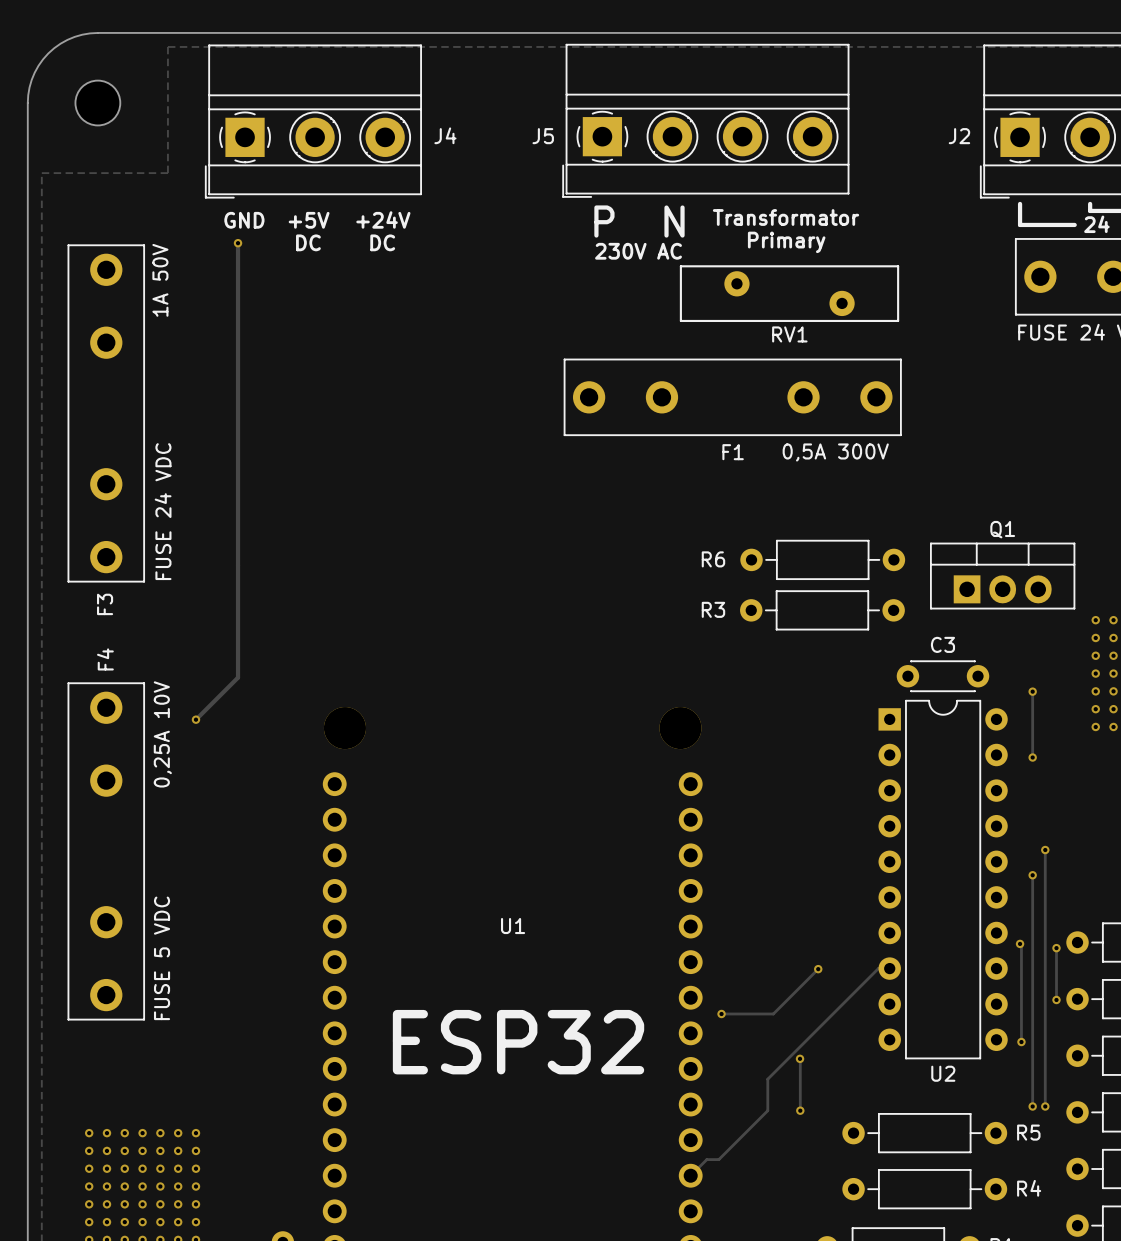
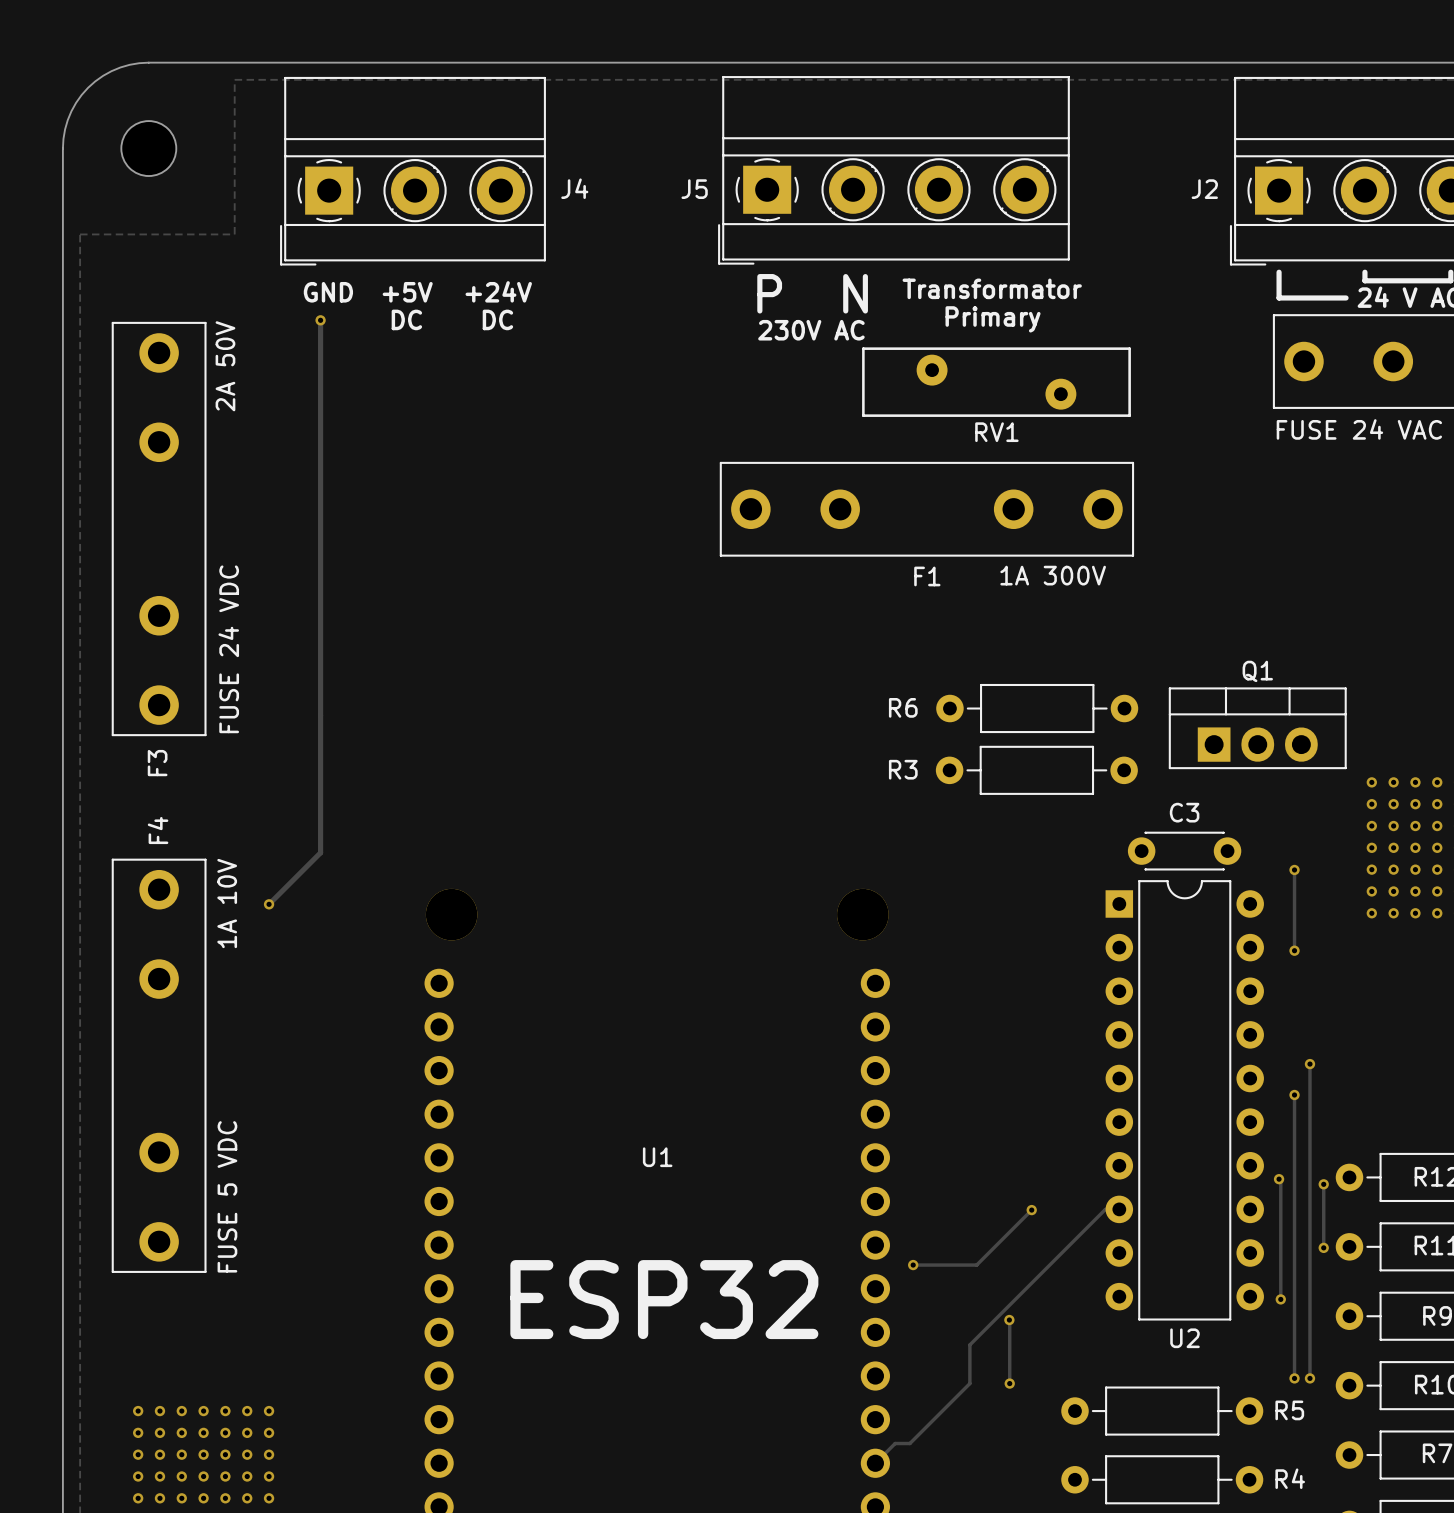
F3 value: 1A 50V (160, 280) -> 2A 50V (225, 366)
F1 value: 0,5A 300V (835, 452) -> 1A 300V (1053, 575)
F4 value: 0,25A 10V (162, 734) -> 1A 10V (227, 903)

